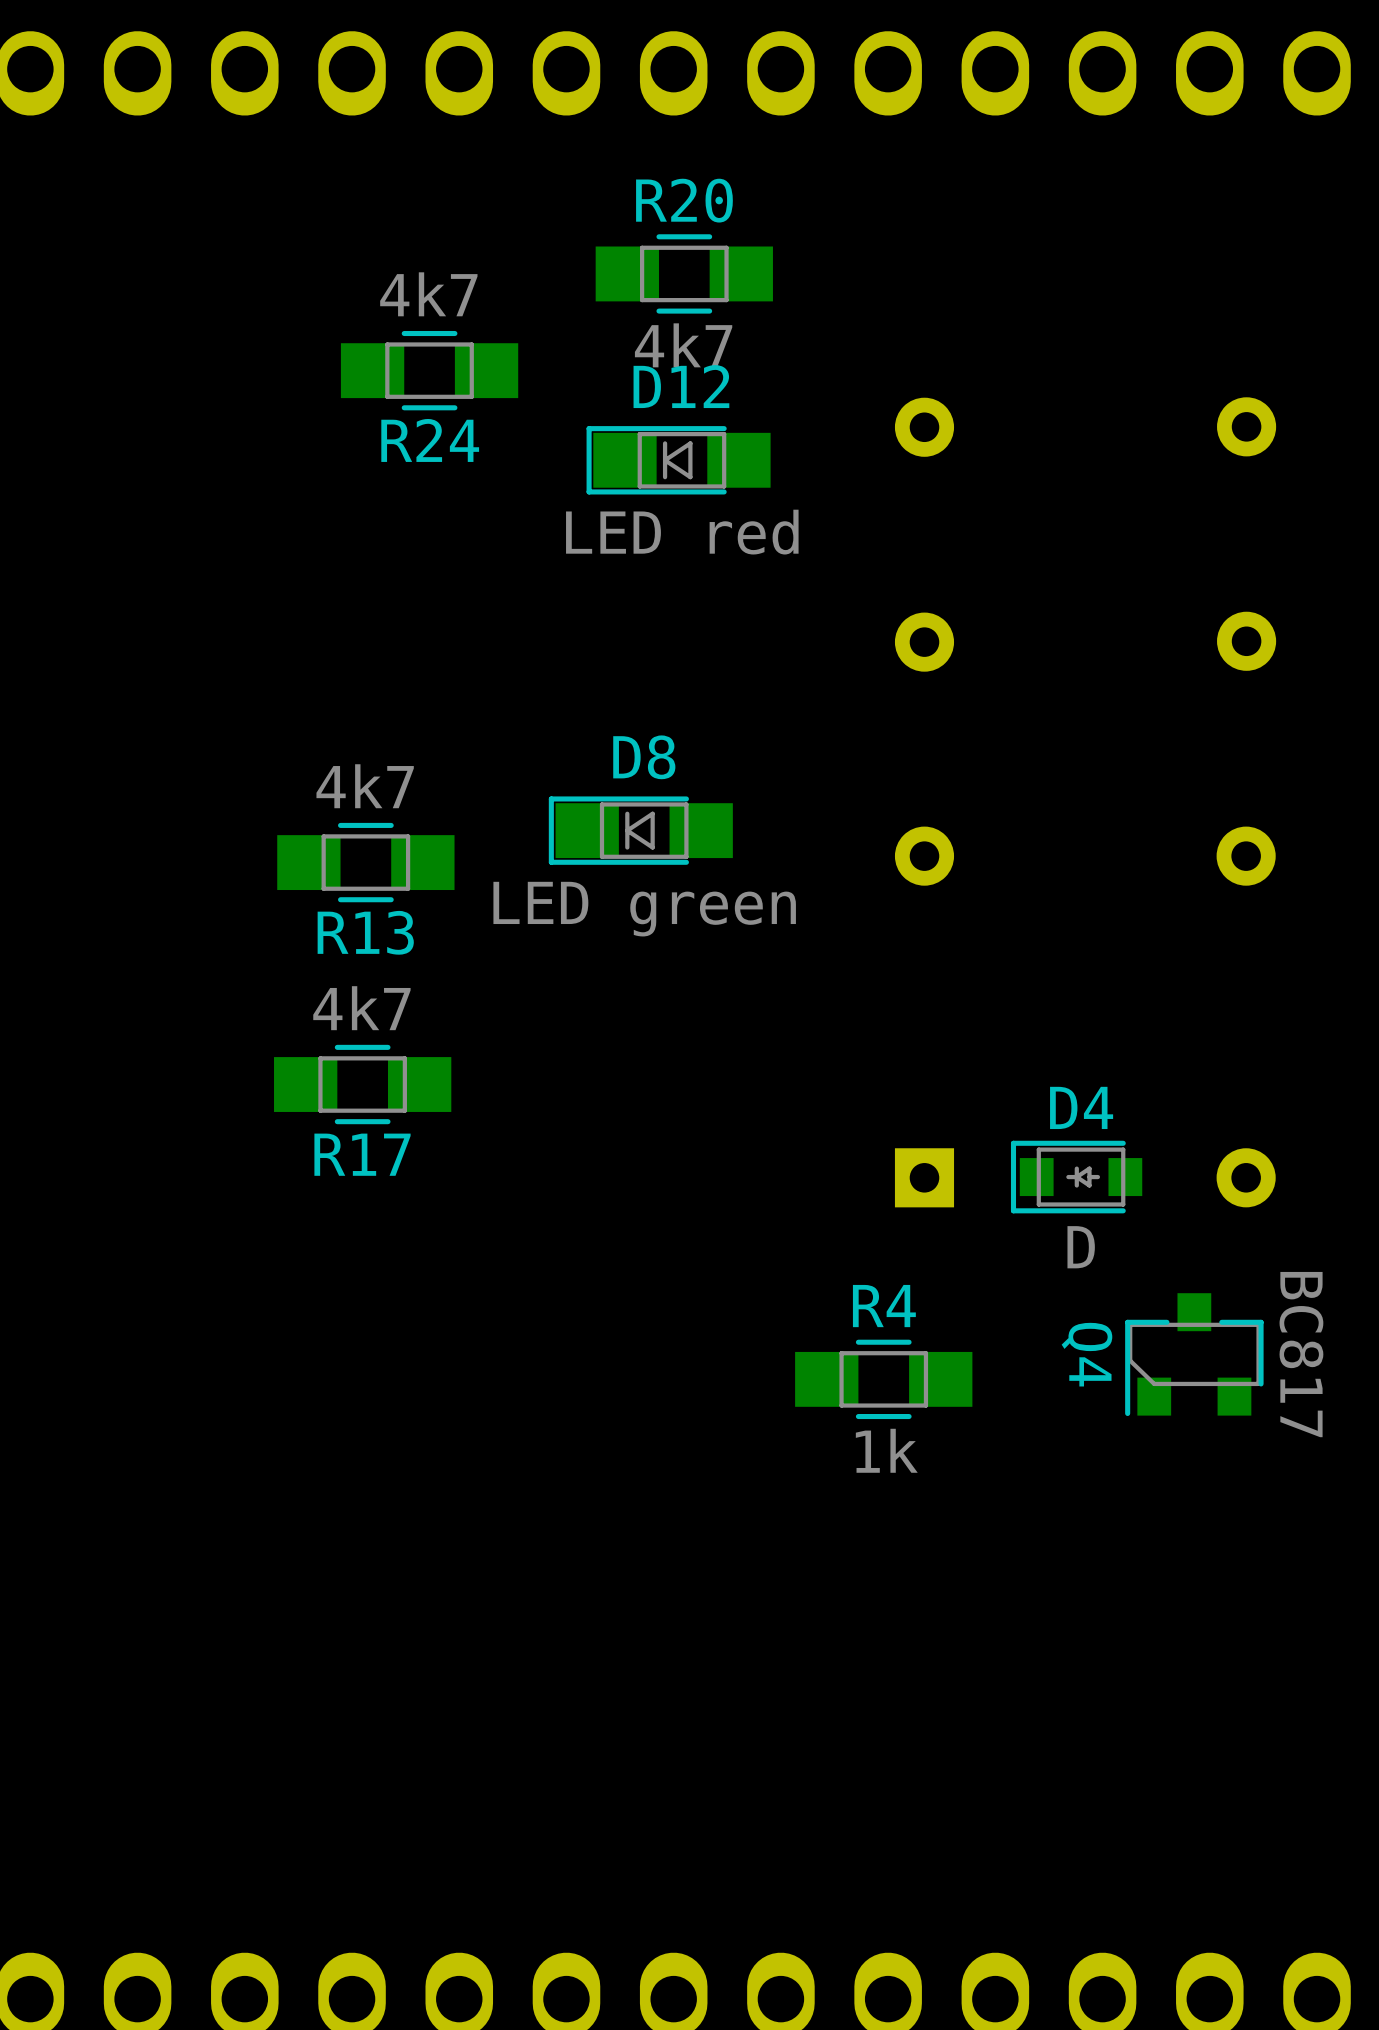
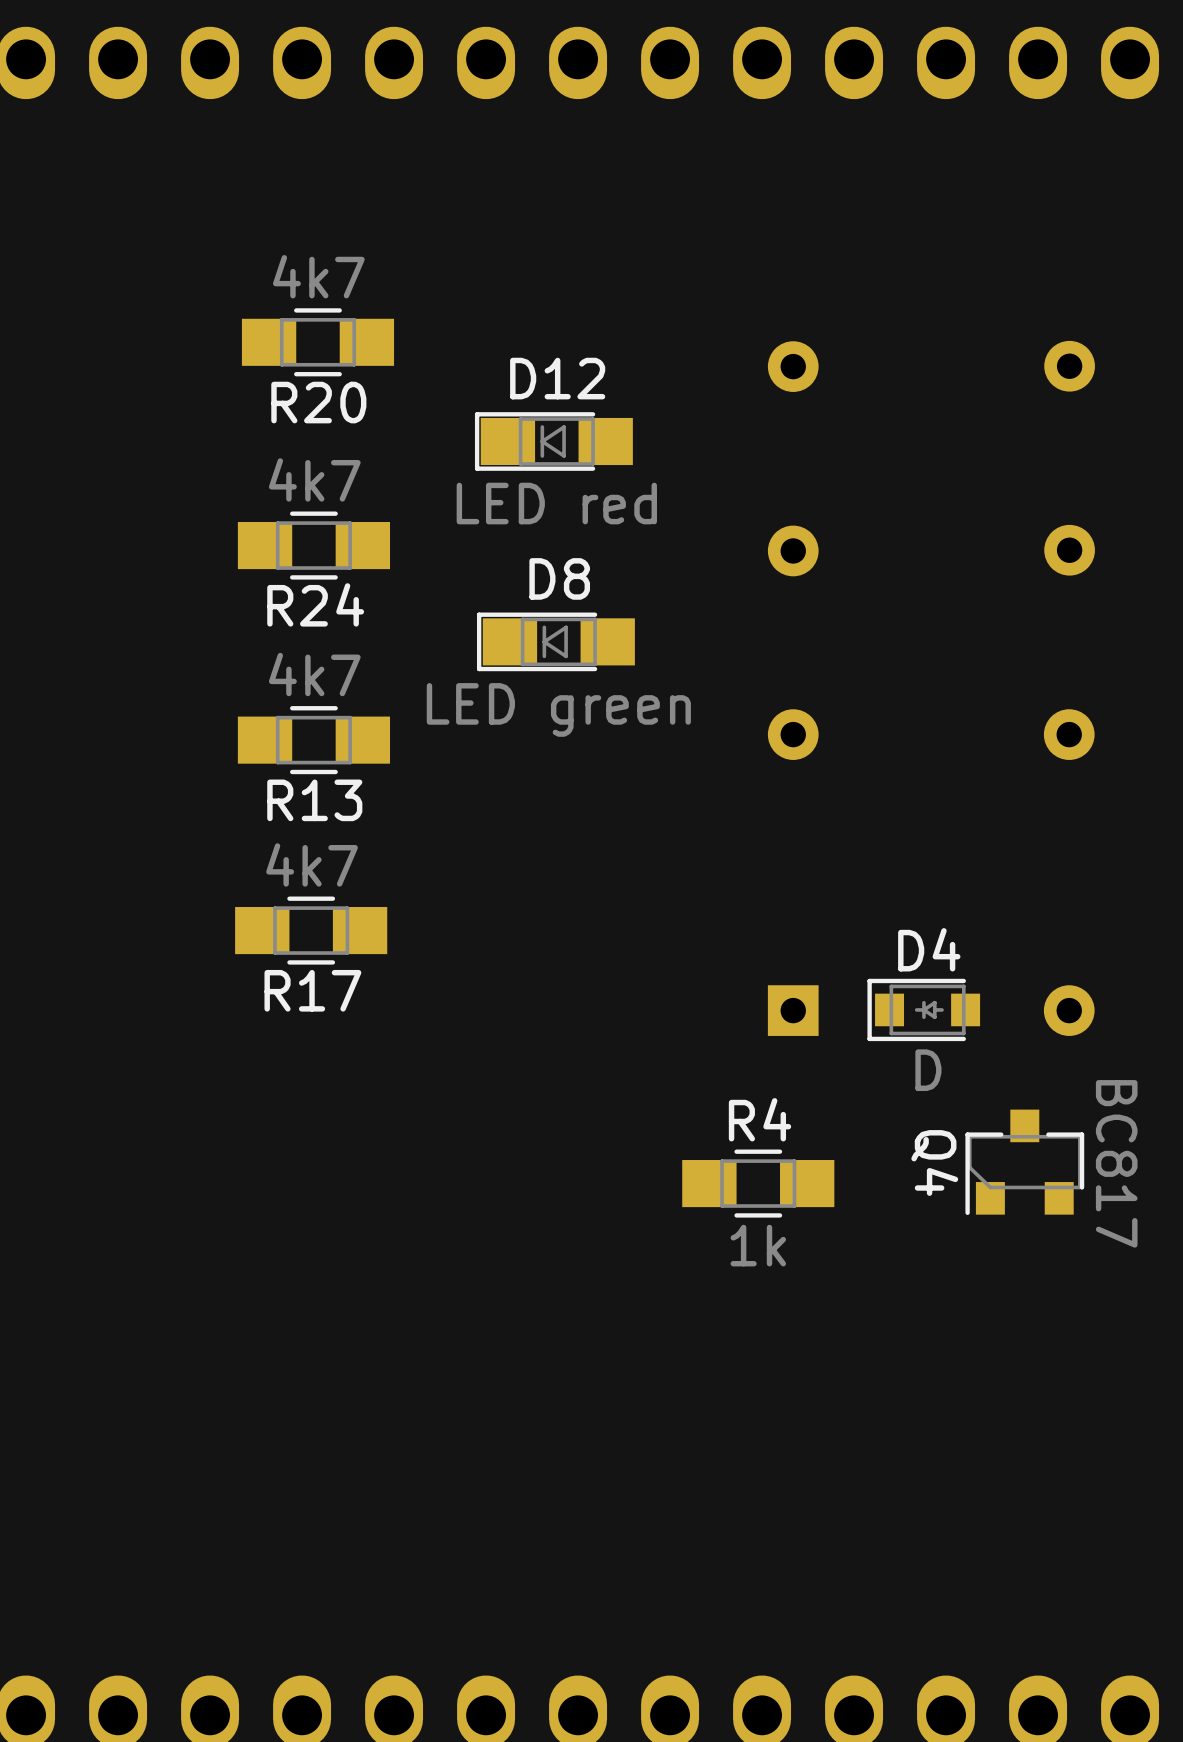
R20 name position: R20 (684, 200) -> R20 (318, 402)
R20 position: (684, 273) -> (317, 342)
R20 value position: 4k7 (683, 345) -> 4k7 (318, 276)
R24 position: (429, 370) -> (313, 545)
D12 position: (678, 460) -> (553, 441)
D8 position: (640, 830) -> (555, 641)

